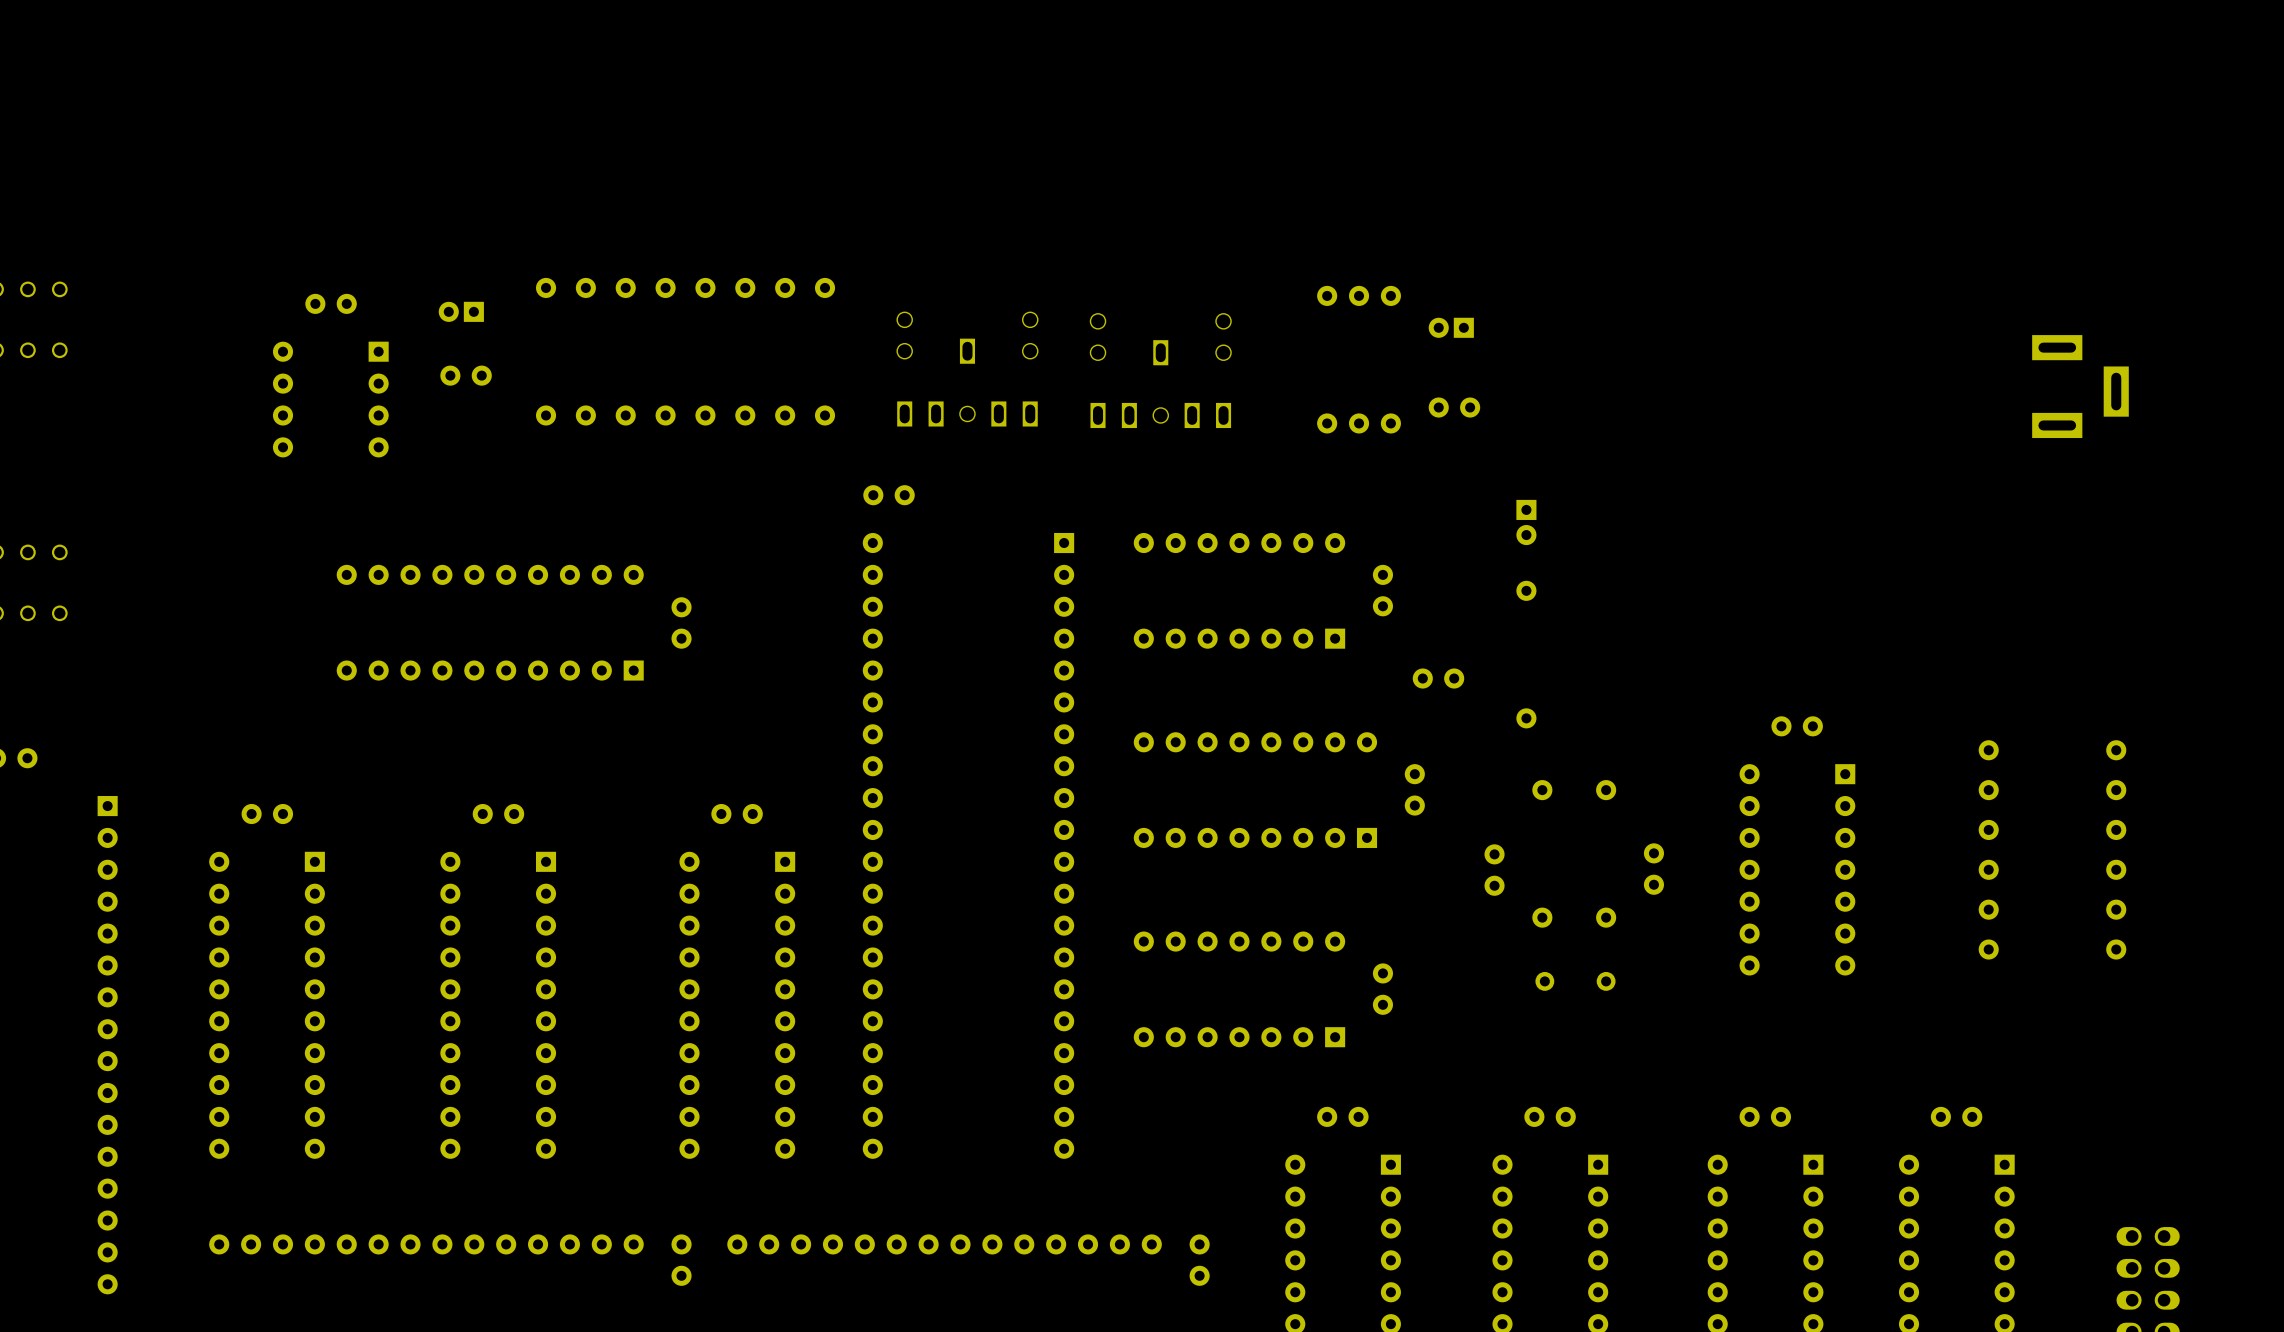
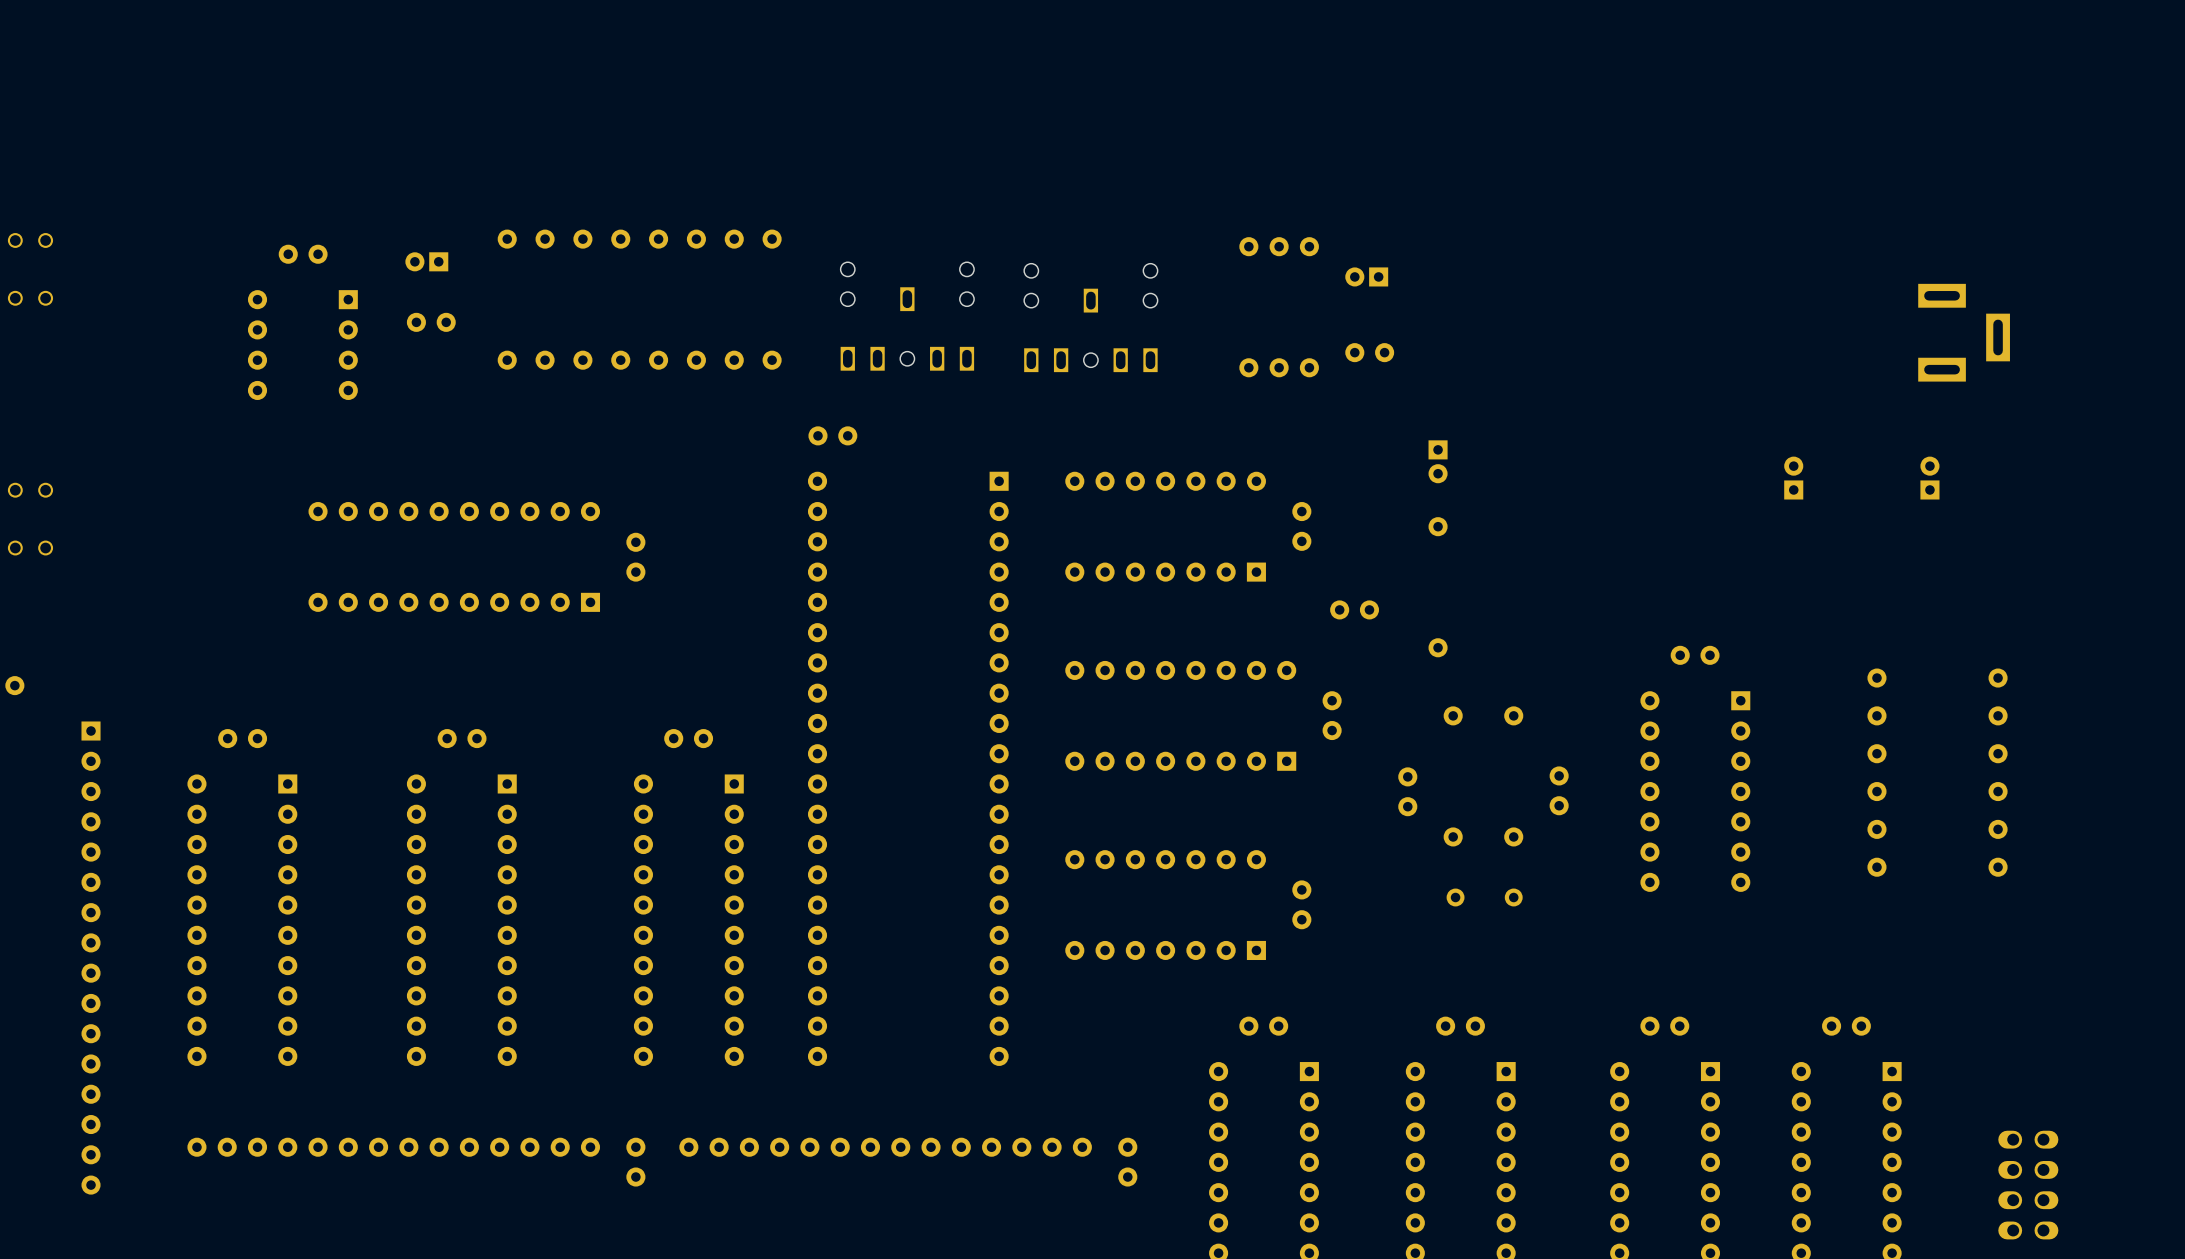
part: none -> (1793, 478)
part: none -> (1929, 478)

